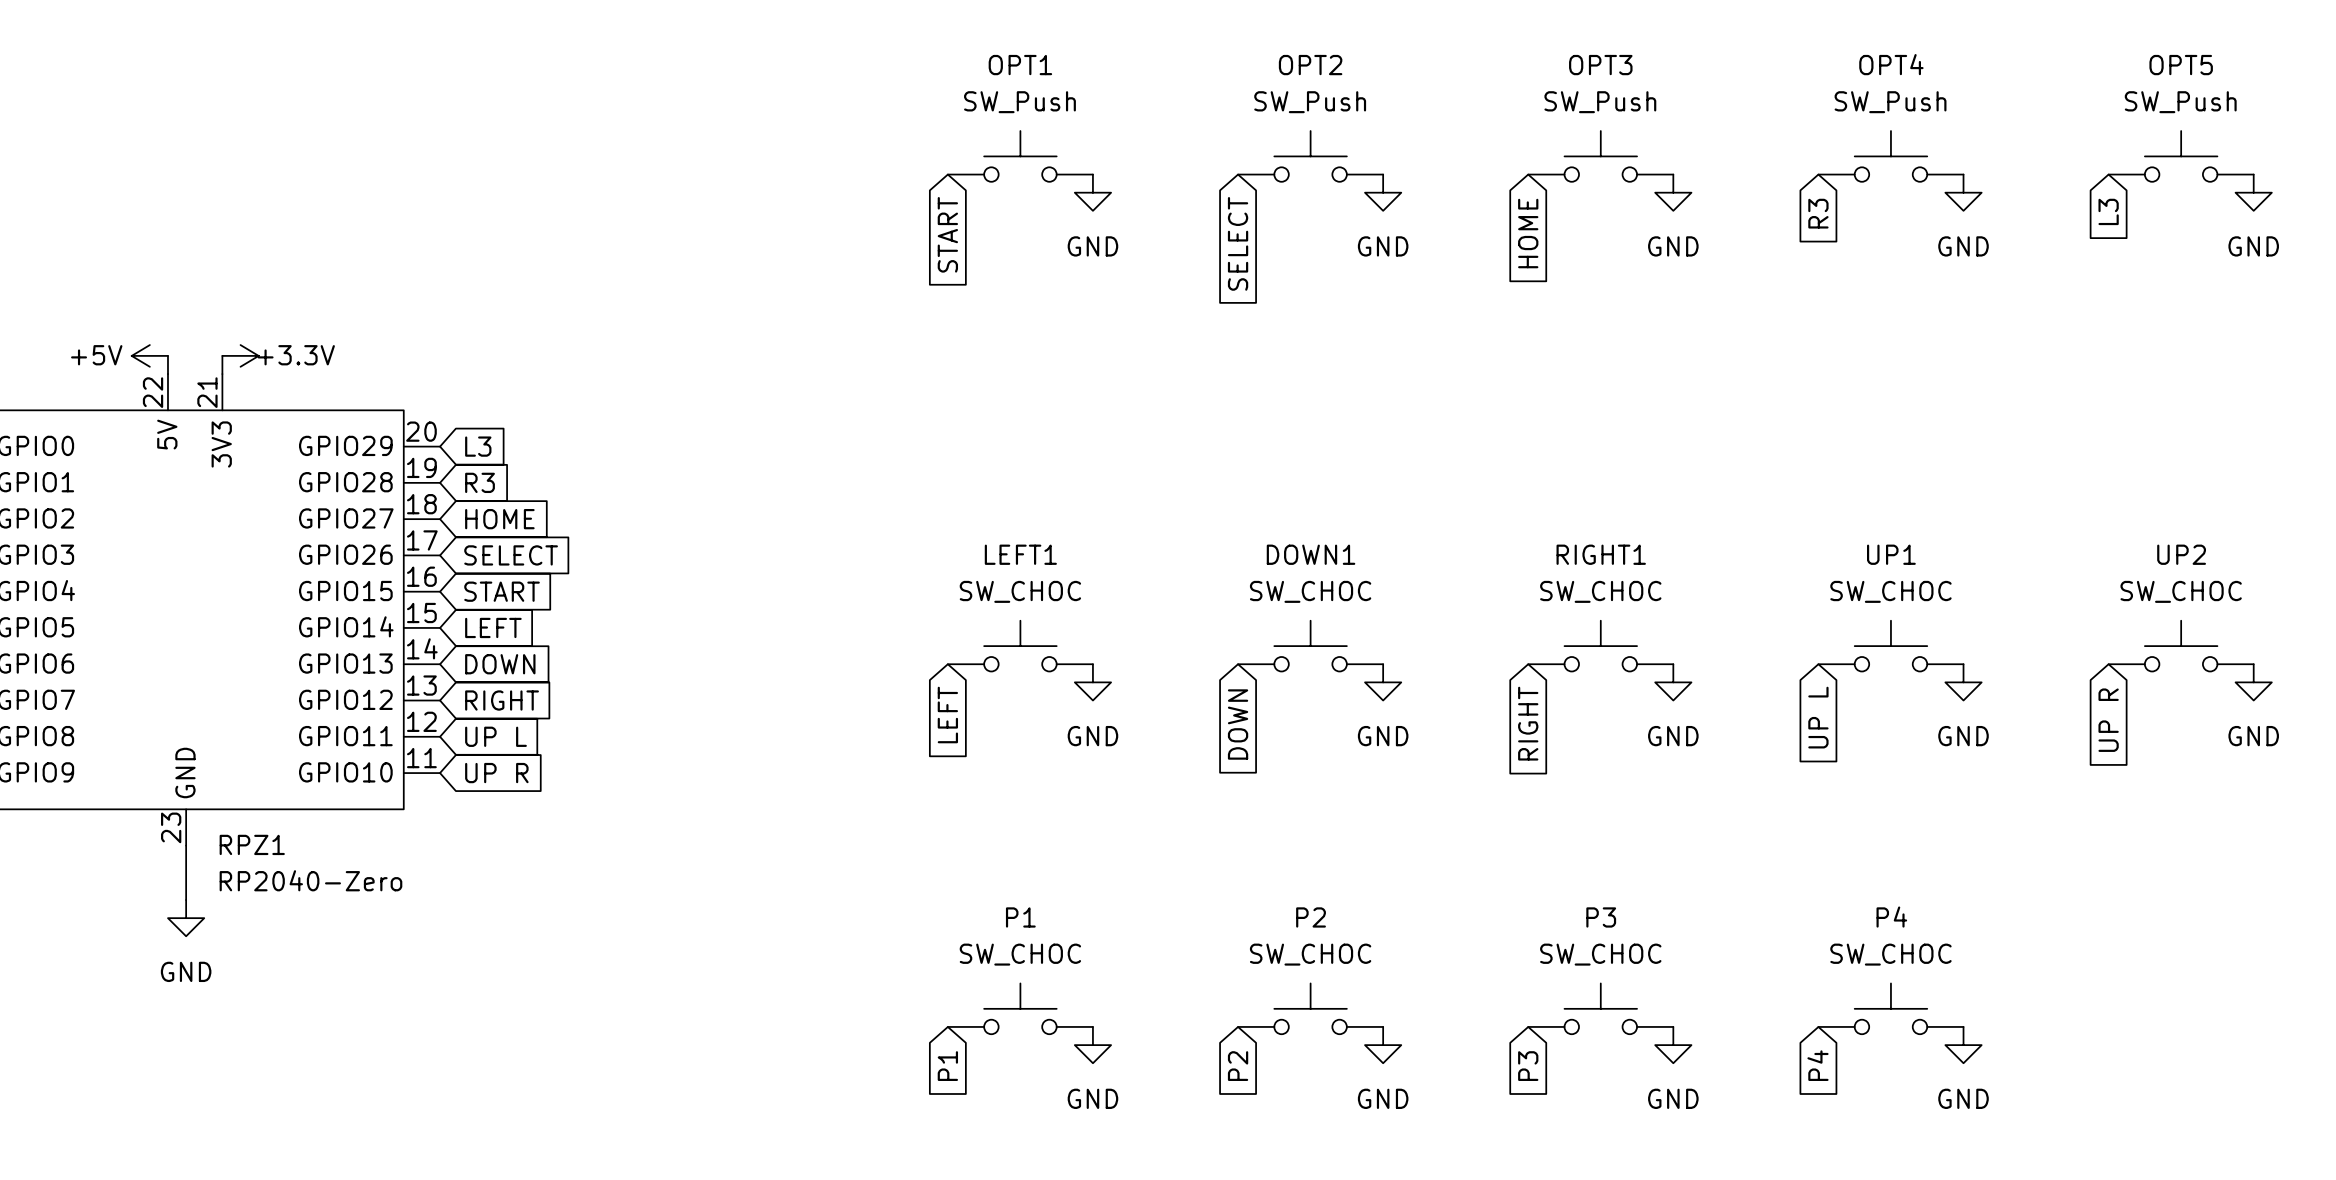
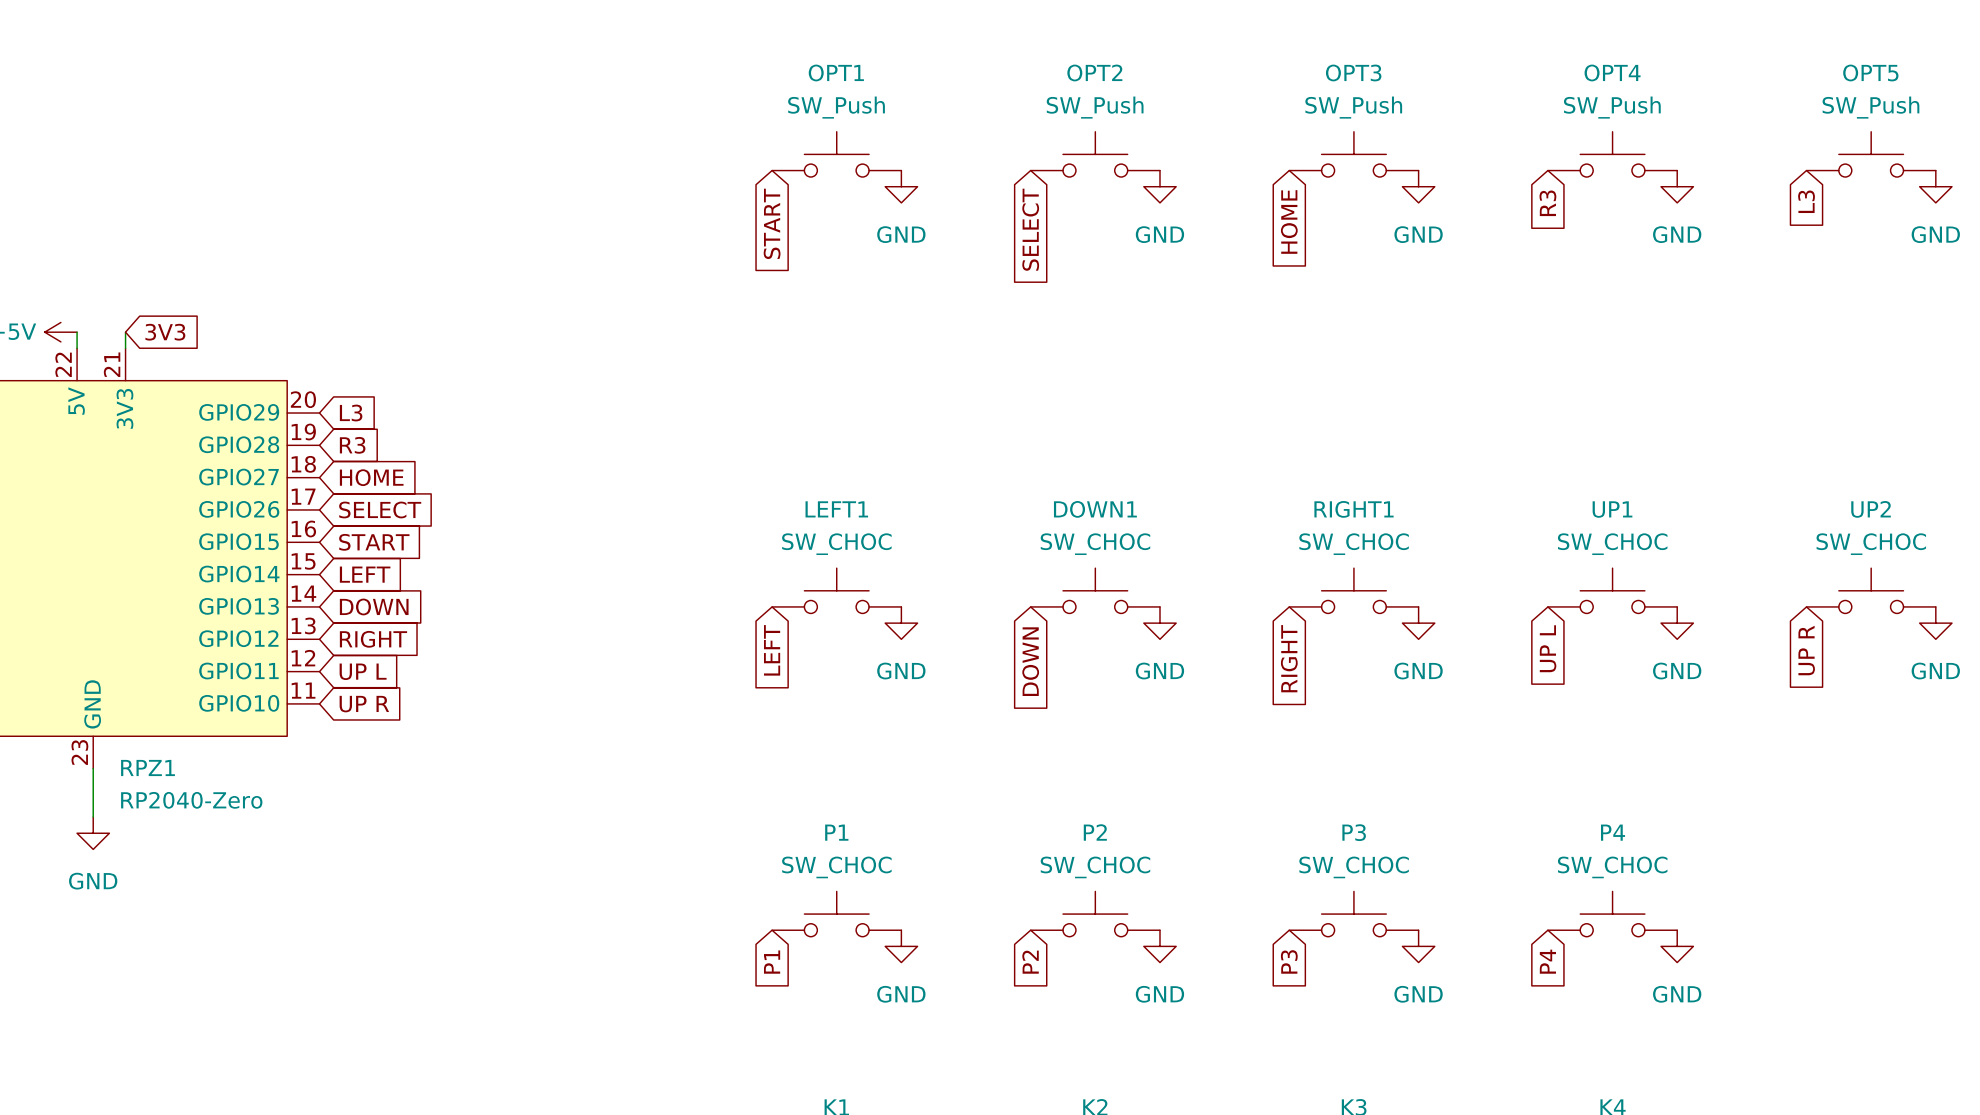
power symbol: +3.3V (240, 355) -> none
global label: none -> 3V3 (165, 332)

